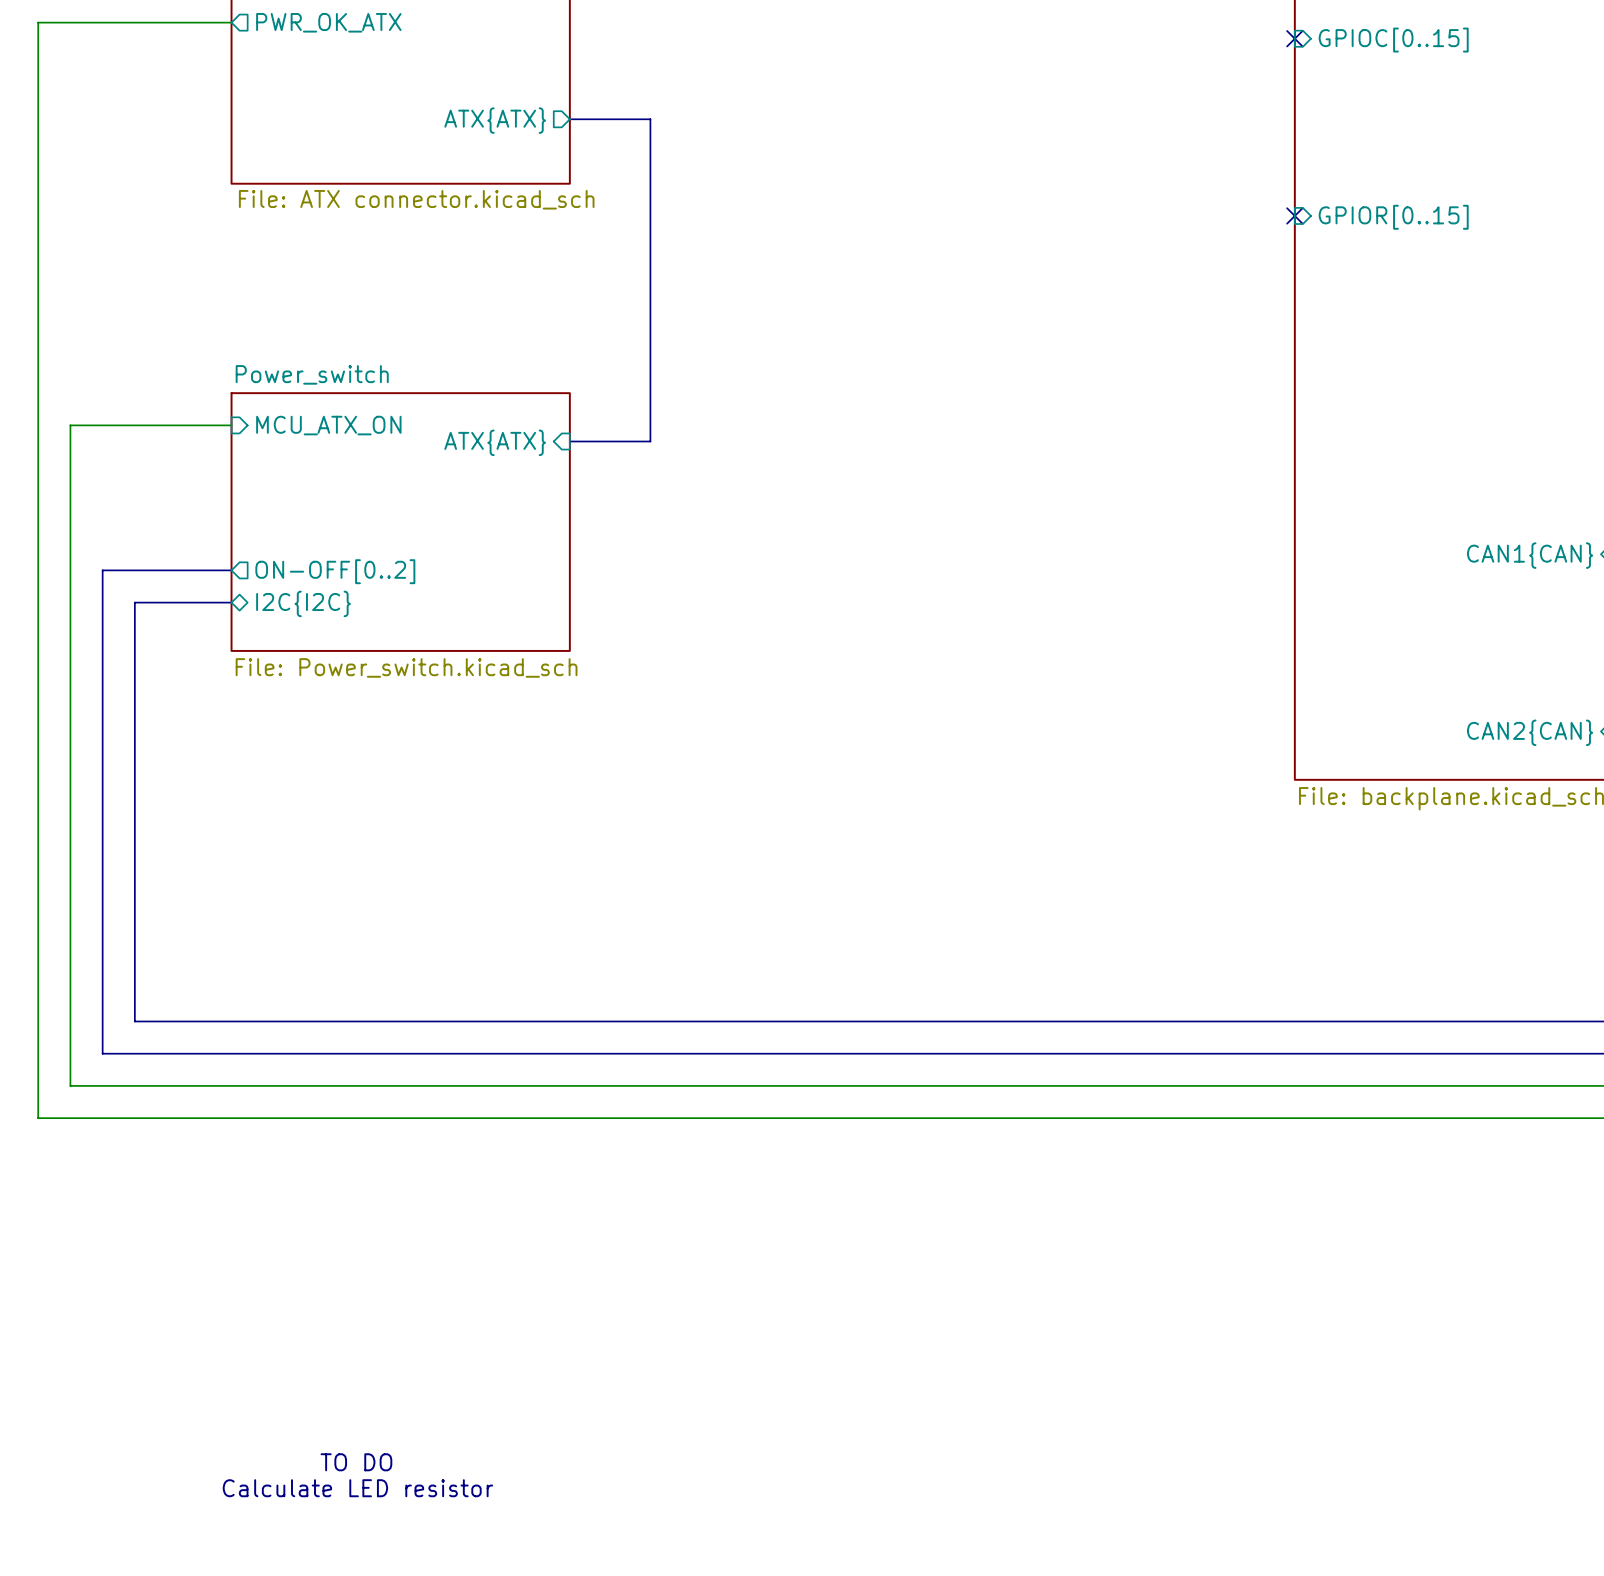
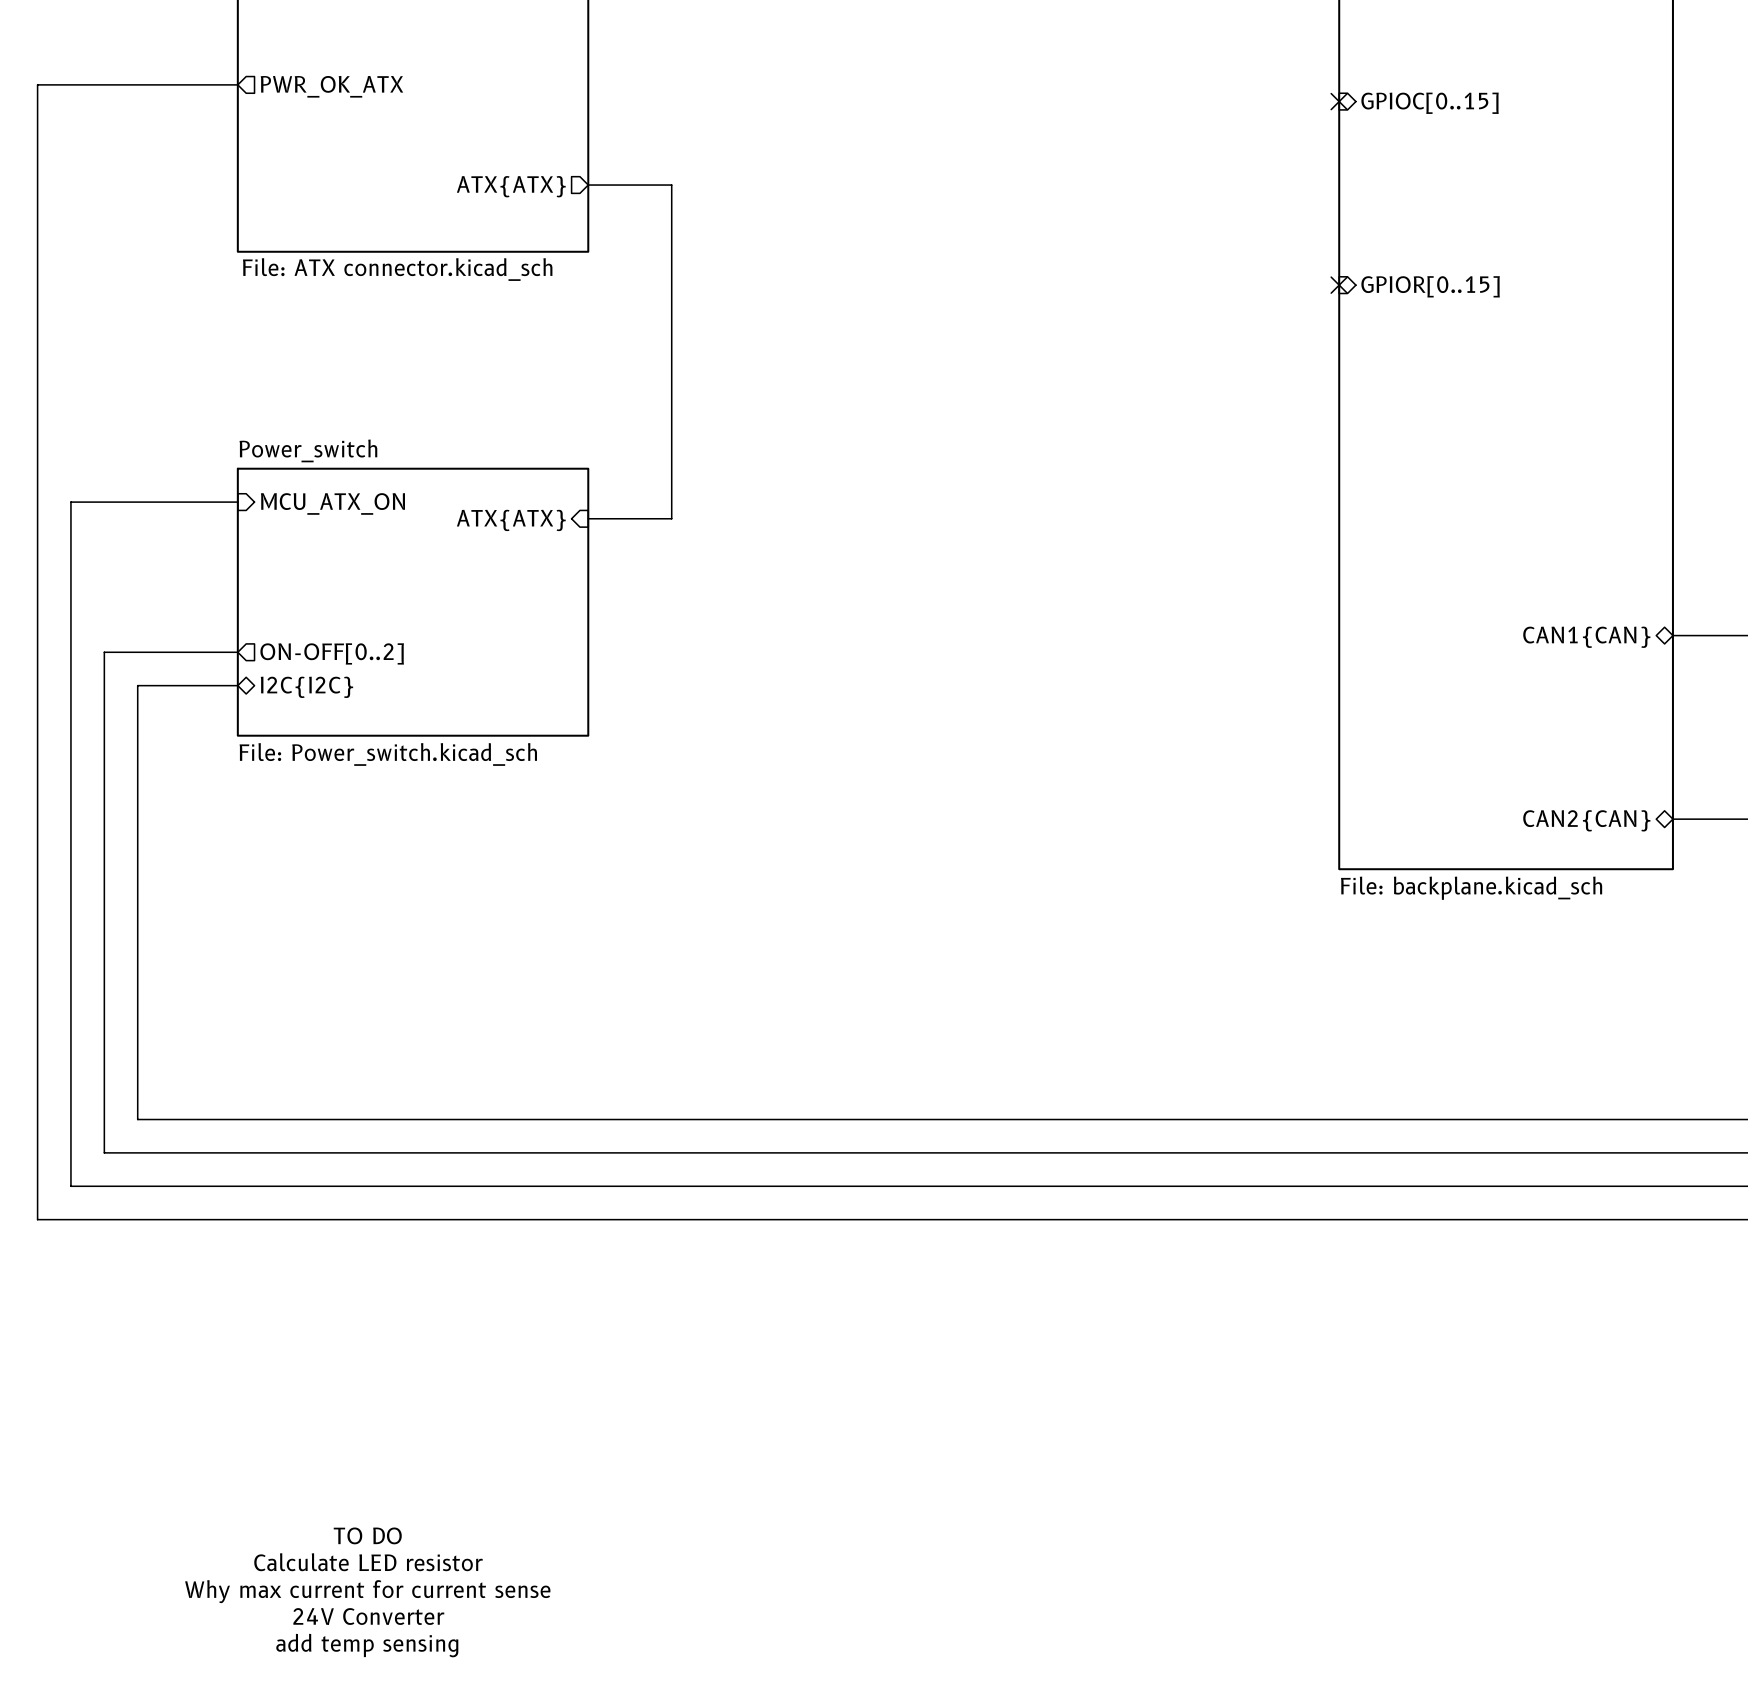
text position: TO DO (356, 1462) -> TO DO (367, 1535)
text: none -> Why max current for current sense (367, 1591)
text position: Calculate LED resistor (357, 1488) -> Calculate LED resistor (368, 1562)
text: none -> 24V Converter (368, 1616)
text: none -> add temp sensing (367, 1645)

